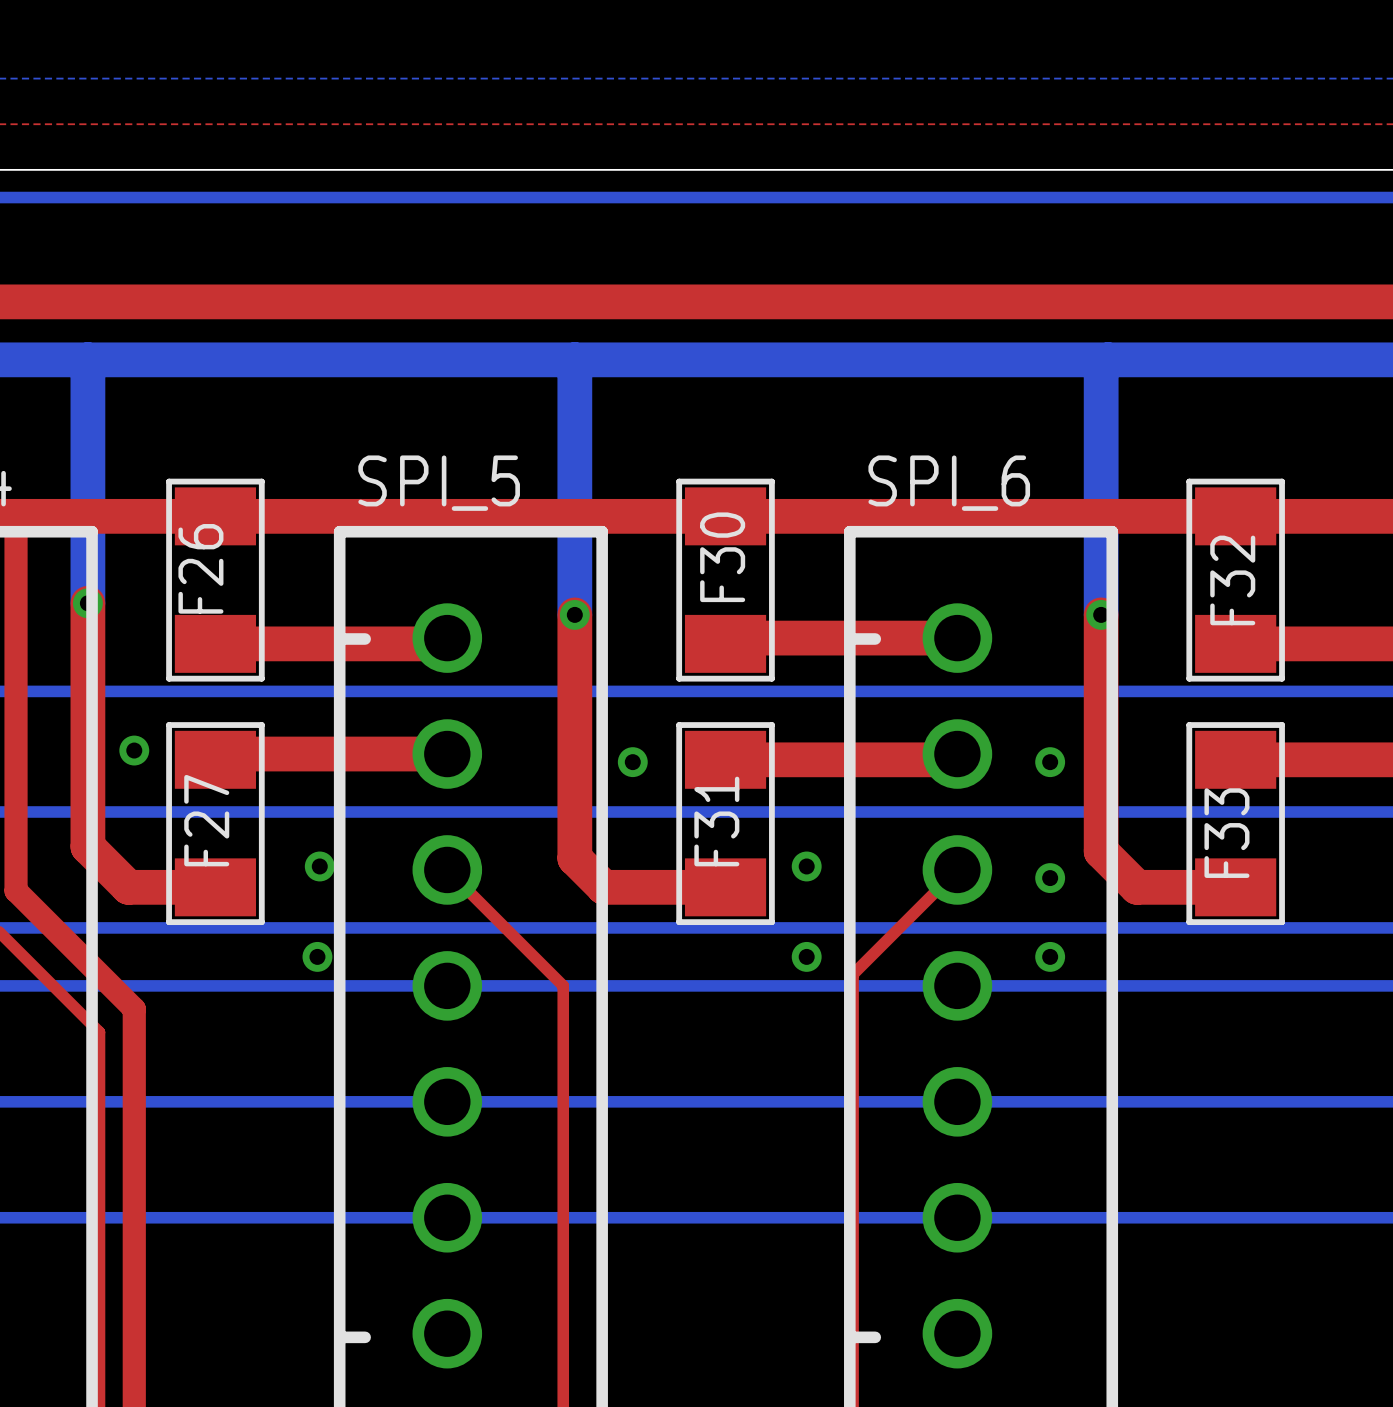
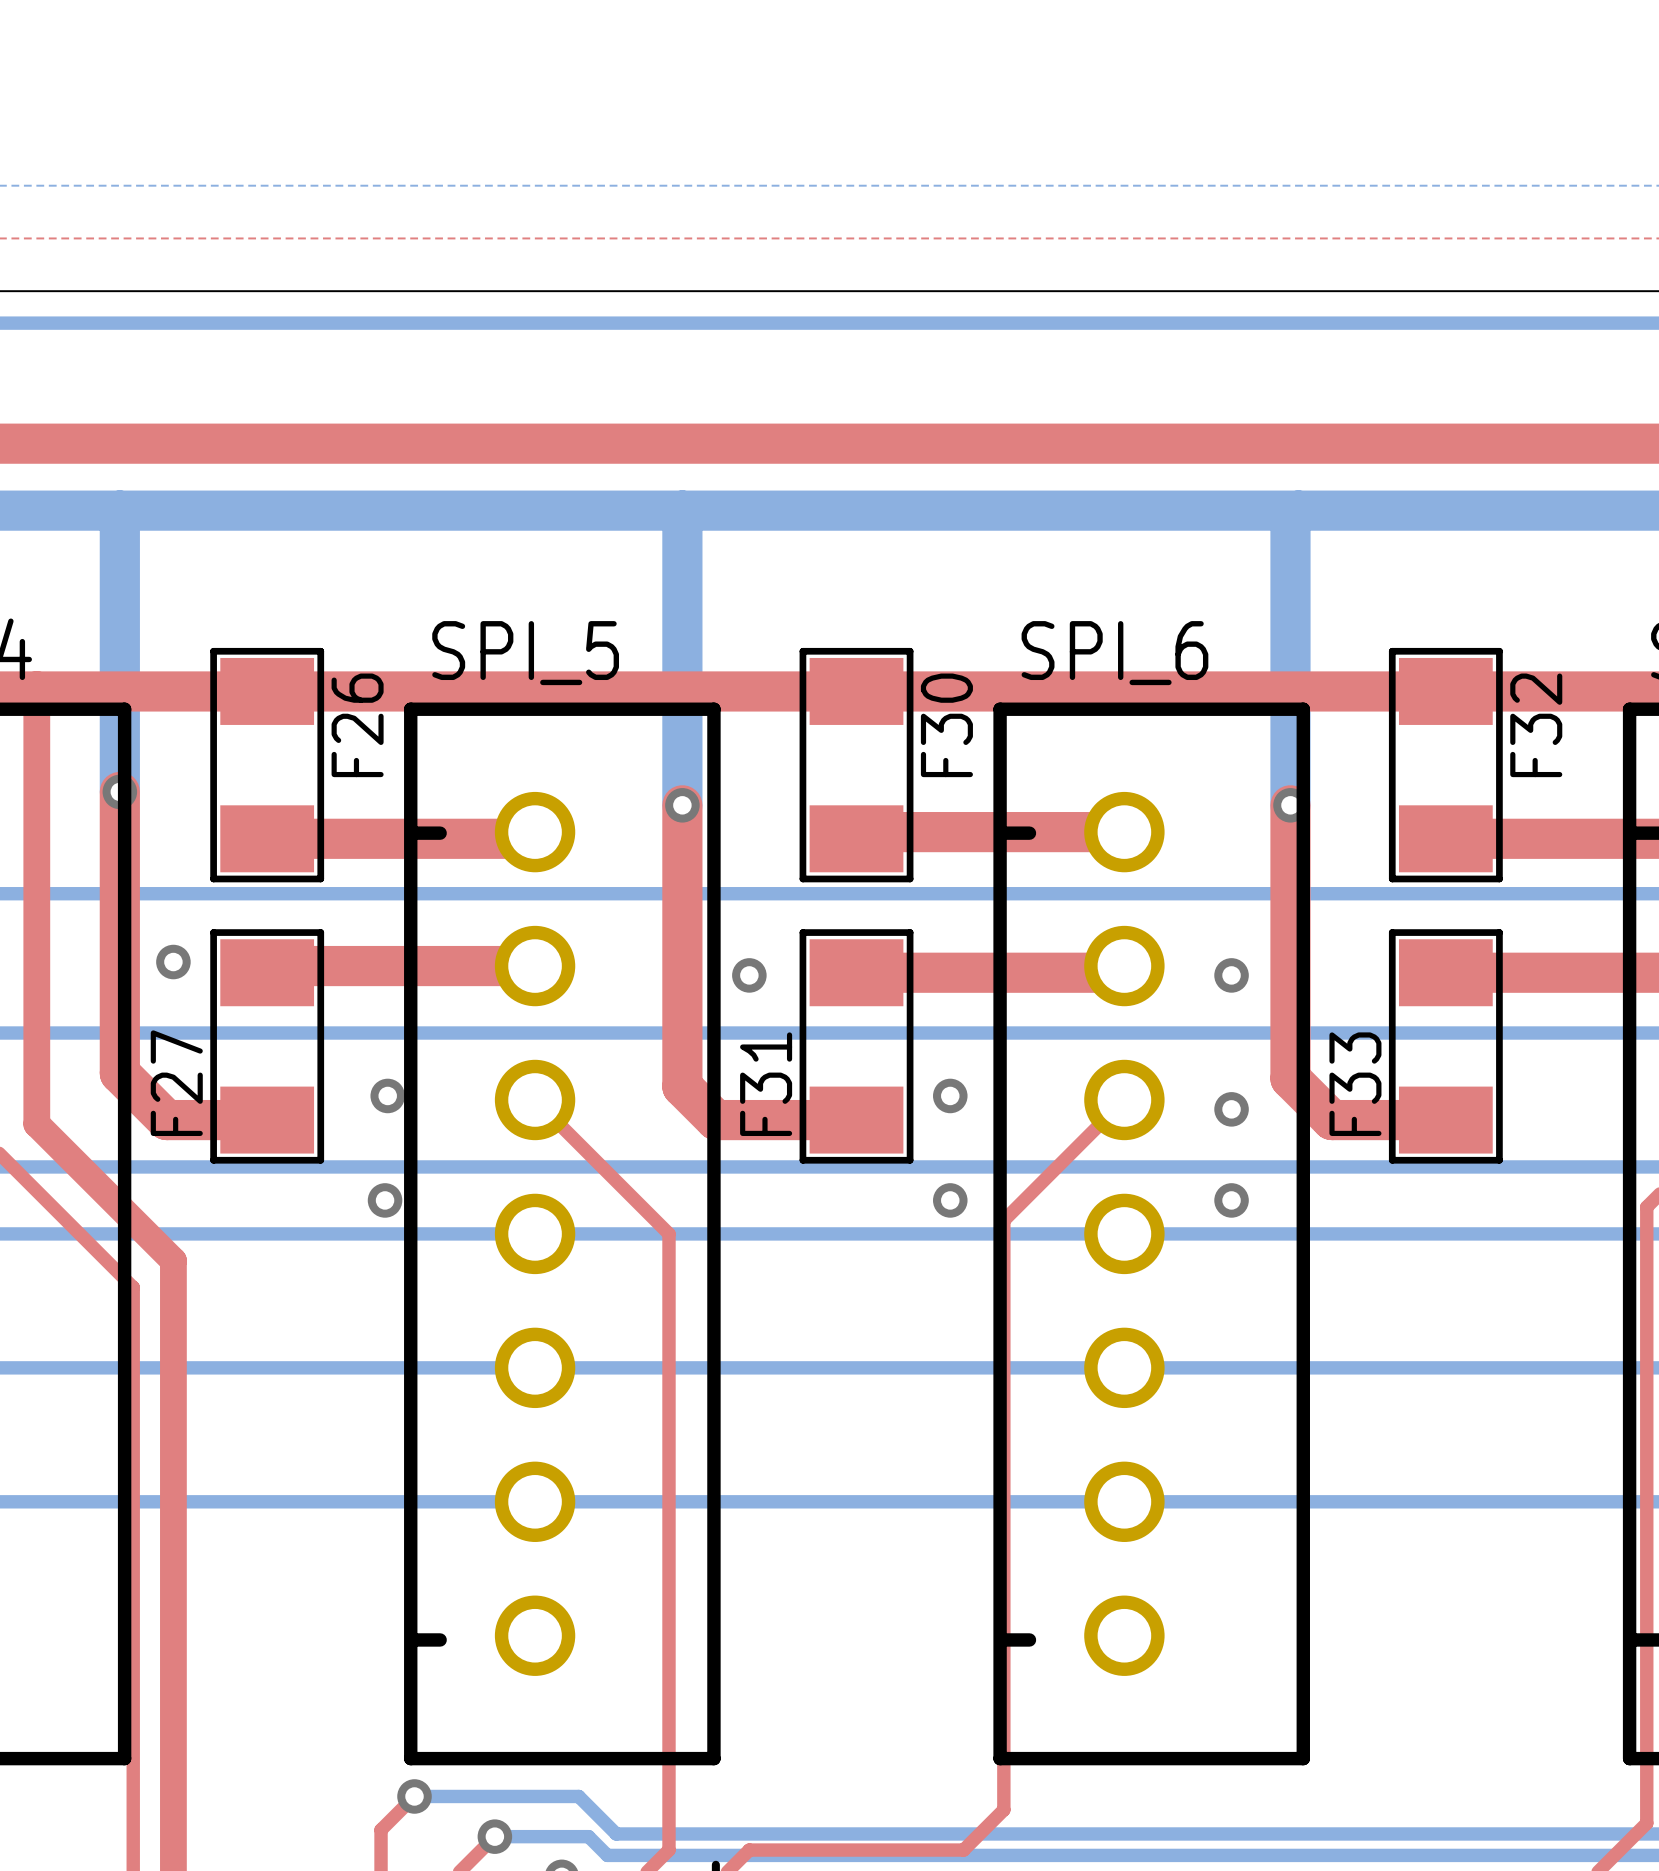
F30 name position: F30 (722, 557) -> F30 (946, 725)
F26 name position: F26 (200, 568) -> F26 (357, 725)
F32 name position: F32 (1232, 580) -> F32 (1536, 725)
F27 name position: F27 (206, 820) -> F27 (176, 1083)
F31 name position: F31 (716, 821) -> F31 (766, 1084)
F33 name position: F33 (1226, 833) -> F33 (1355, 1084)

